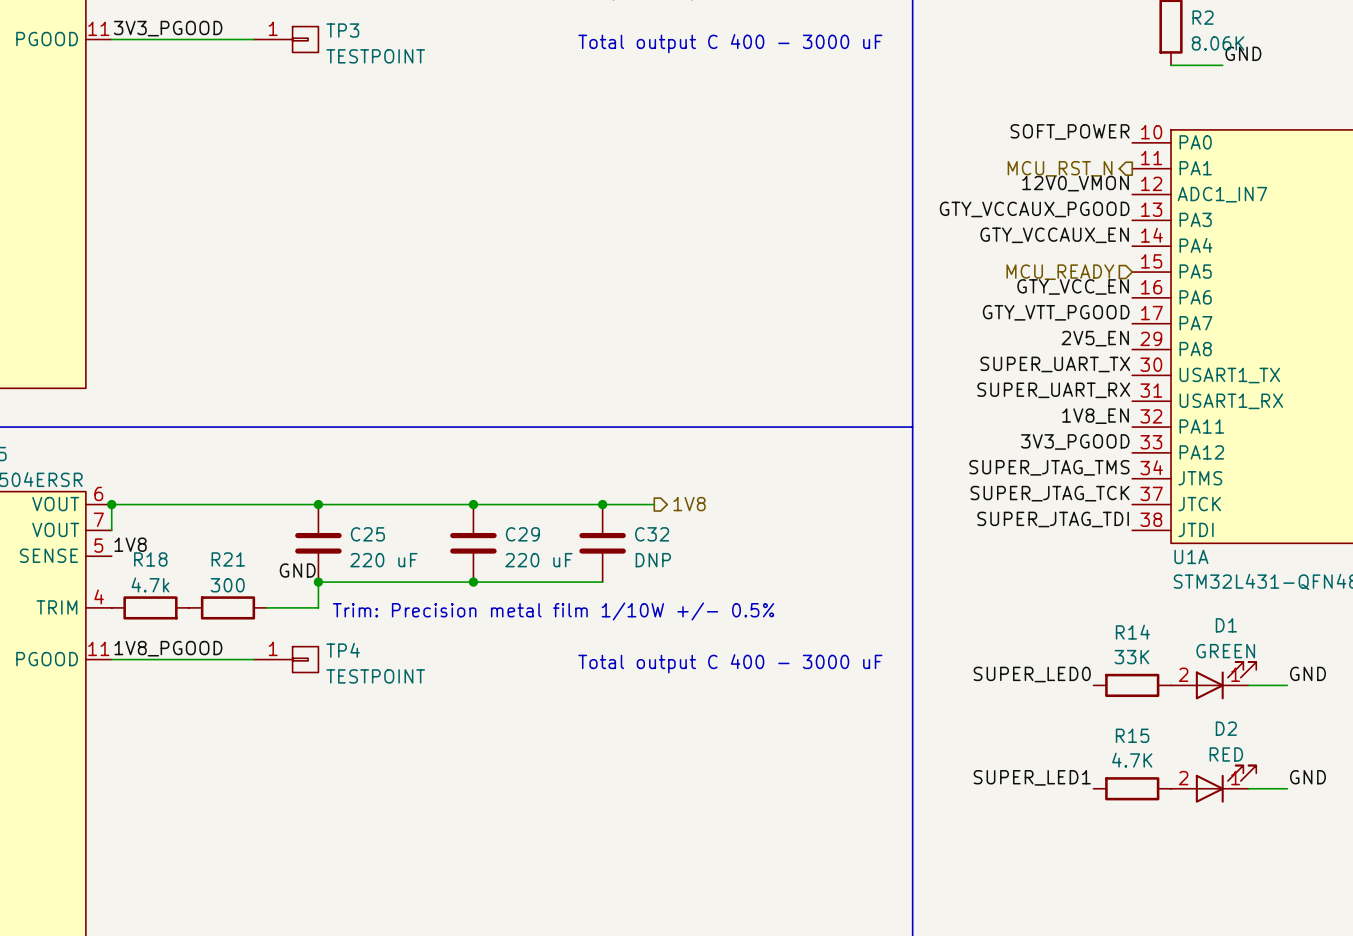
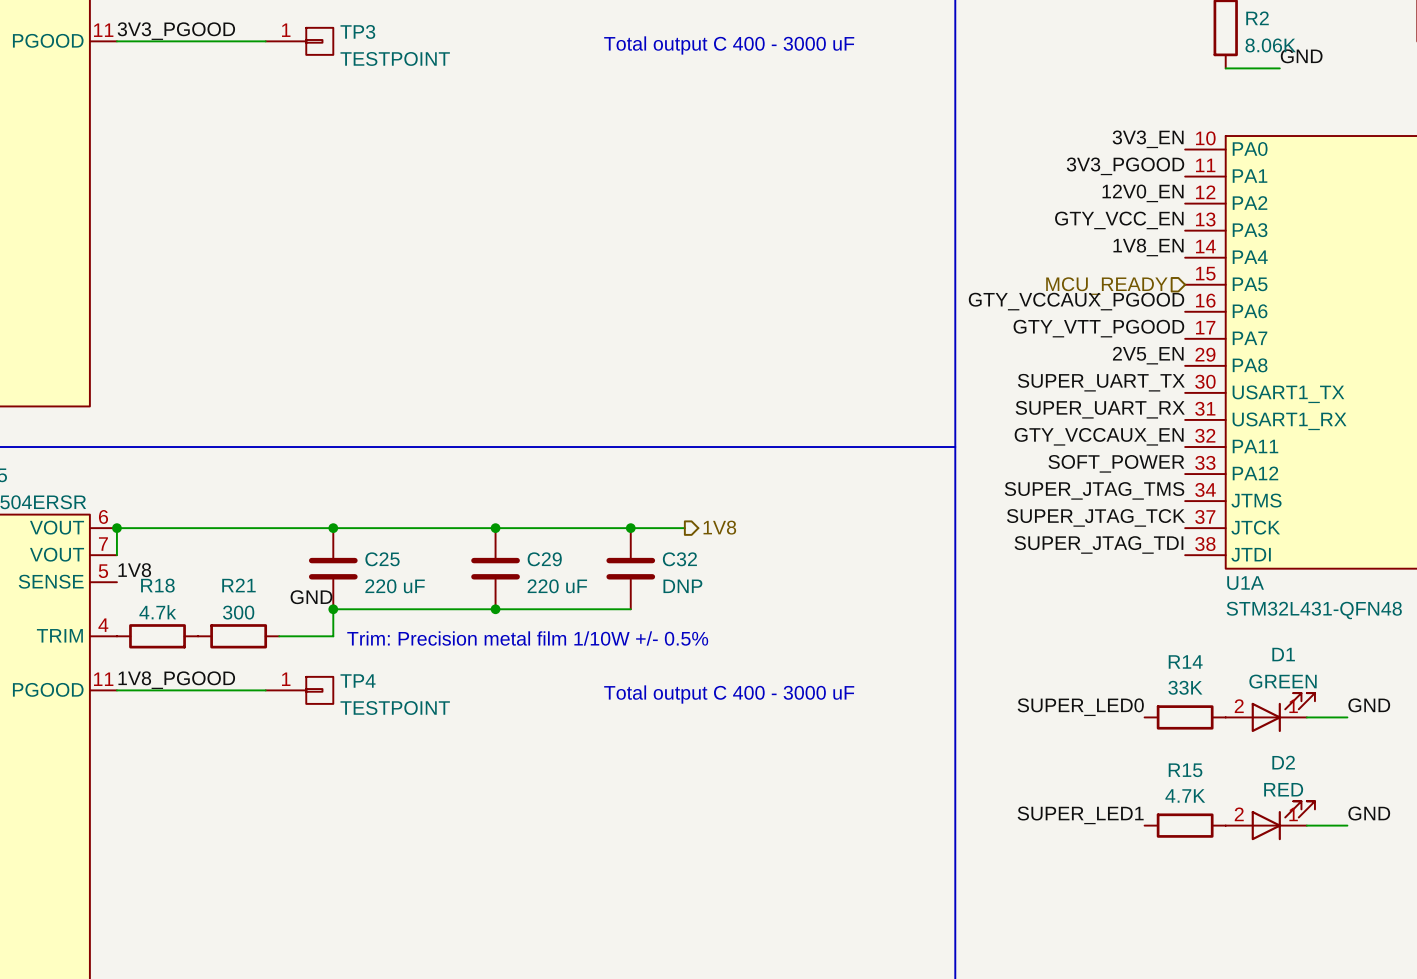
label: SOFT_POWER (1070, 131) -> 3V3_EN (1148, 139)
label: none -> 3V3_PGOOD (1125, 166)
hierarchical label: MCU_RST_N (1060, 168) -> none
label: 12V0_VMON (1075, 183) -> 12V0_EN (1143, 193)
U1A pin name: ADC1_IN7 (1222, 194) -> PA2 (1250, 203)
label: GTY_VCCAUX_PGOOD (1034, 209) -> GTY_VCC_EN (1119, 220)
label: GTY_VCCAUX_EN (1054, 235) -> 1V8_EN (1148, 247)
label: GTY_VCC_EN (1073, 286) -> GTY_VCCAUX_PGOOD (1076, 301)
label: 1V8_EN (1095, 416) -> GTY_VCCAUX_EN (1099, 436)
label: 3V3_PGOOD (1075, 441) -> SOFT_POWER (1116, 463)

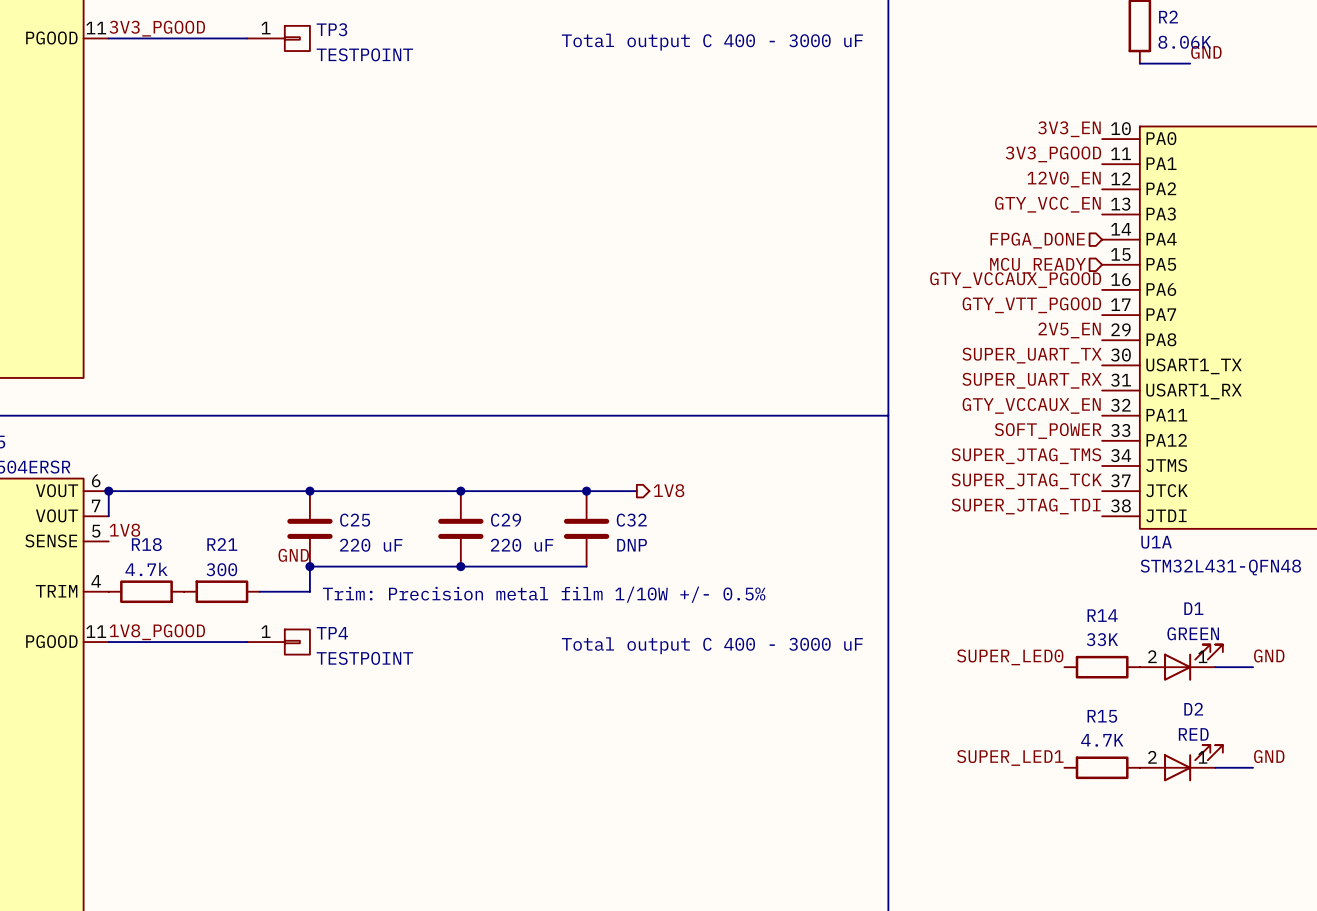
label: 1V8_EN (1148, 247) -> none
hierarchical label: none -> FPGA_DONE (1037, 240)

